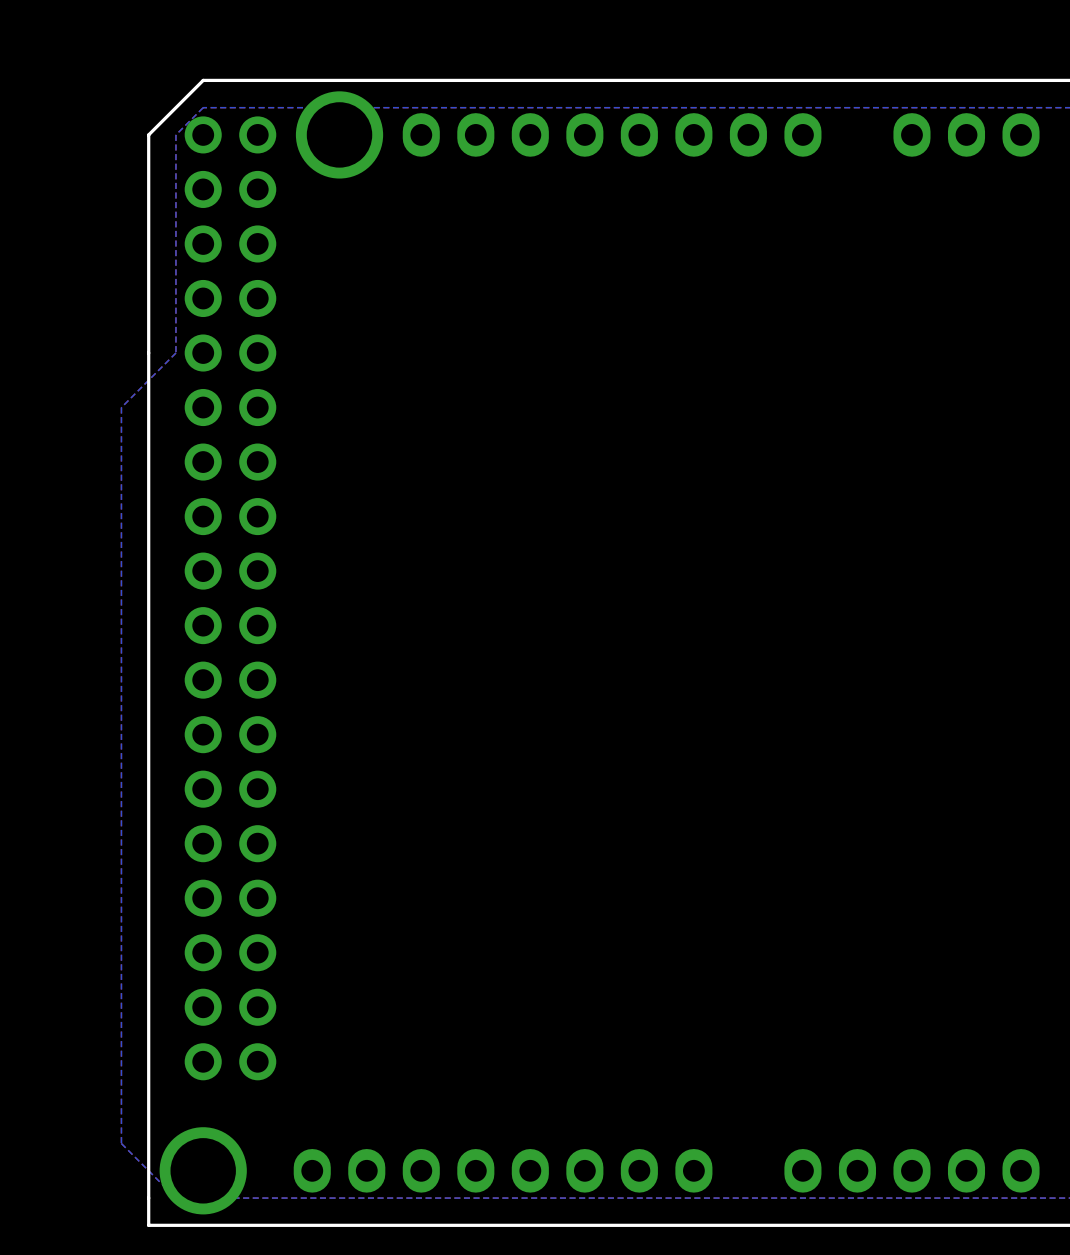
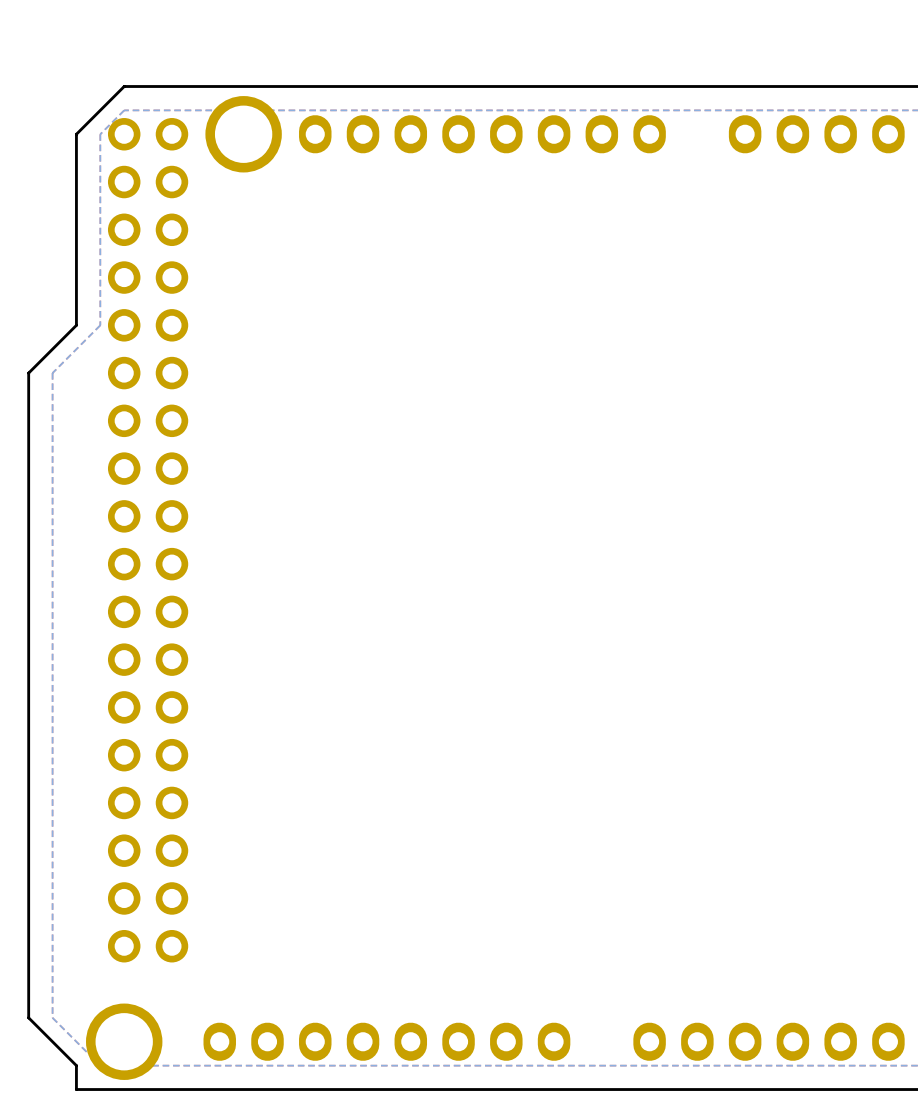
board edge: (148, 353) (148, 1198) -> (76, 325) (28, 373) (28, 1017) (76, 1065)

